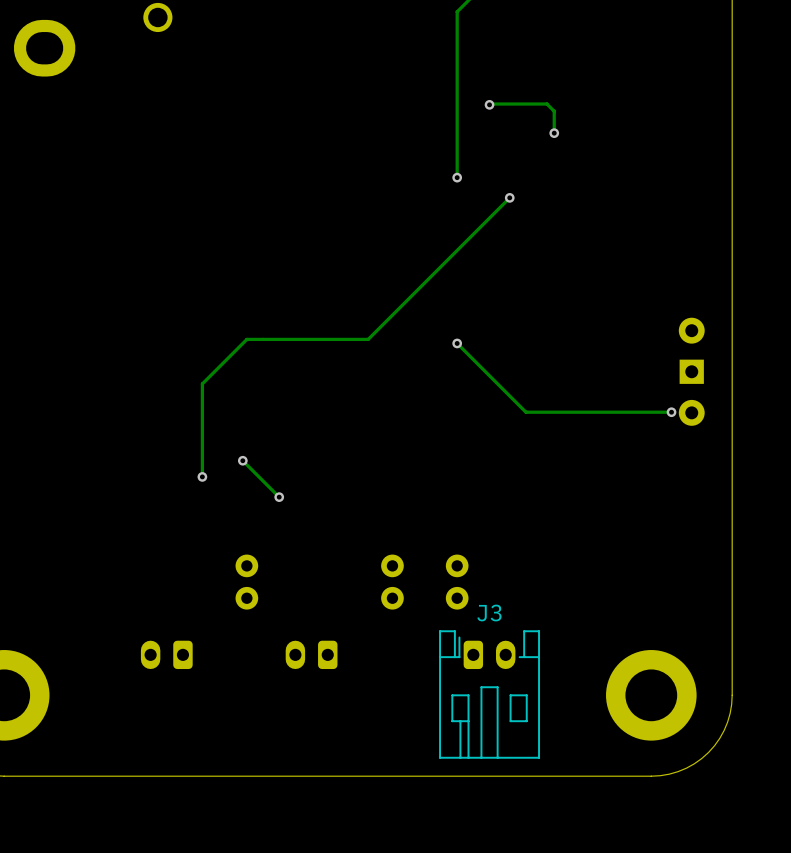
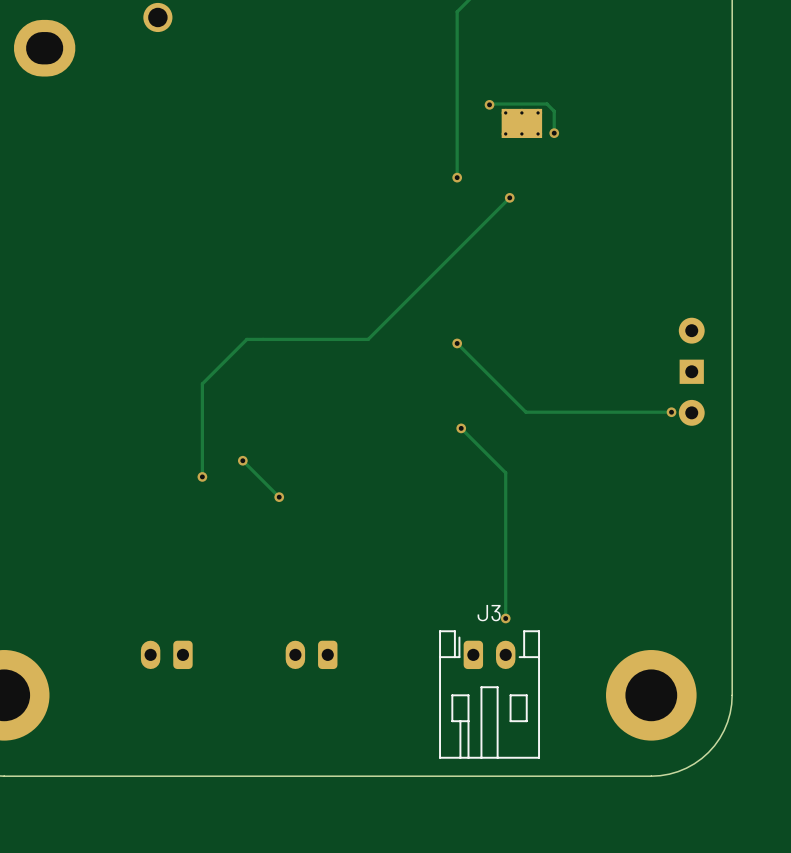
part: none -> (521, 123)
track: none -> (461, 428) (505, 472) (505, 618)
via: none -> (461, 428)
part: (246, 582) -> none
part: (392, 582) -> none
part: (457, 582) -> none
via: none -> (505, 618)

